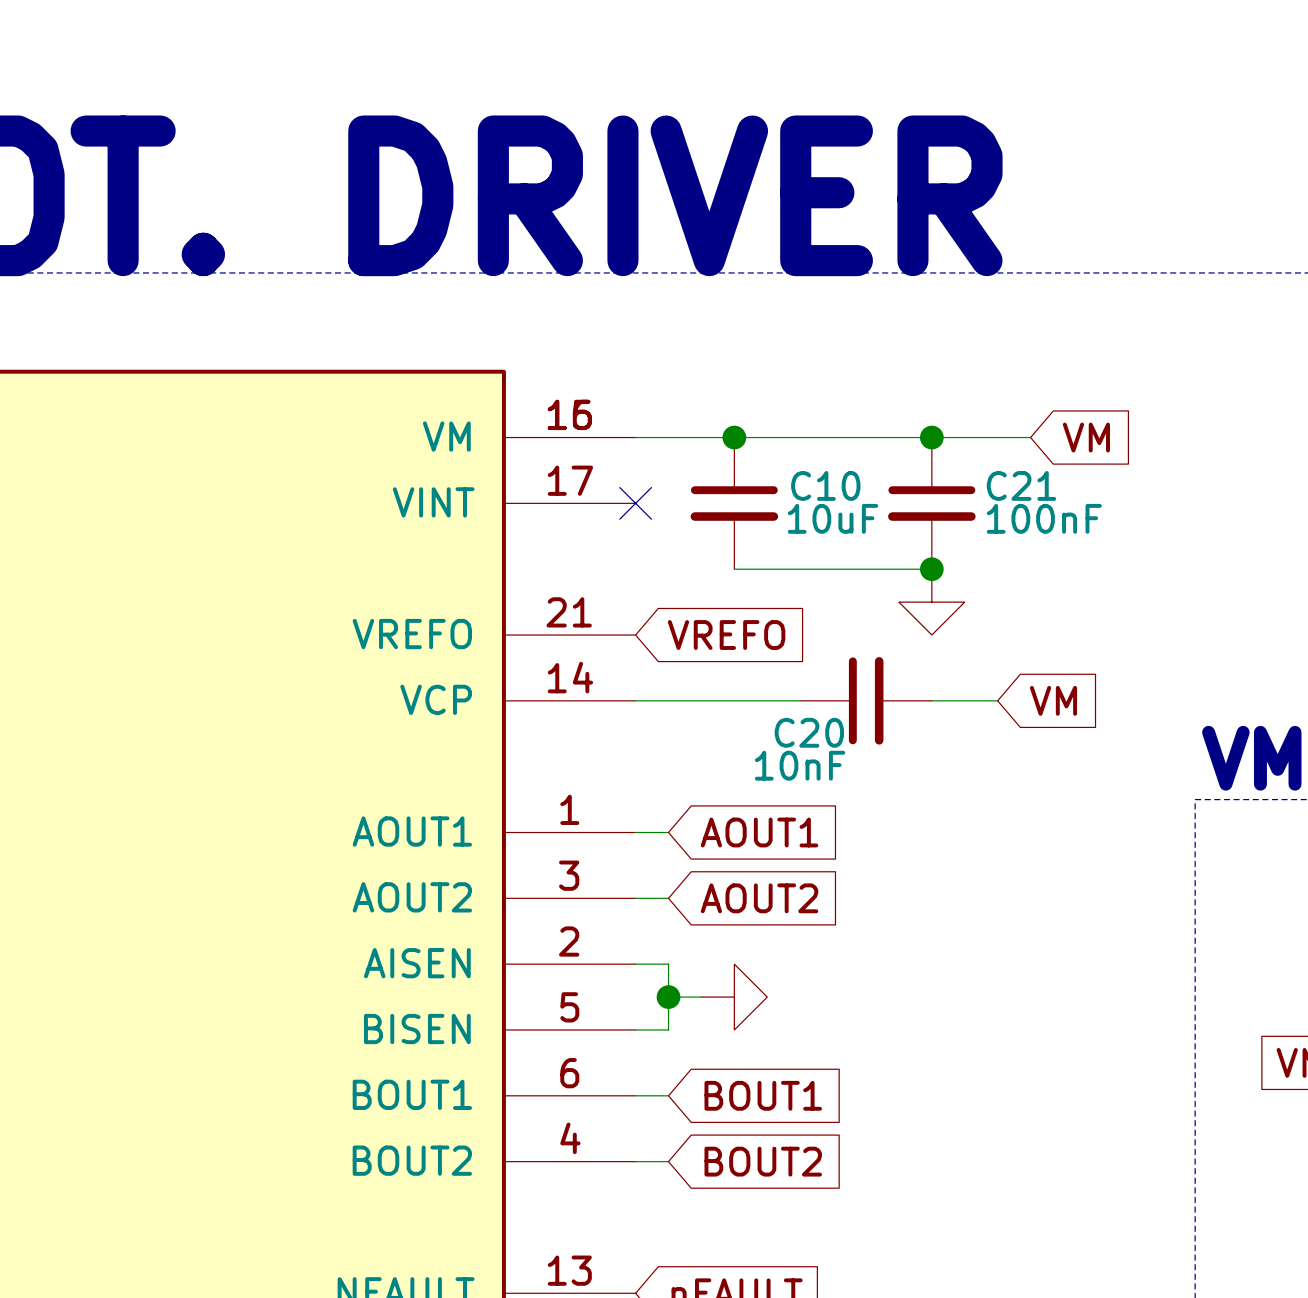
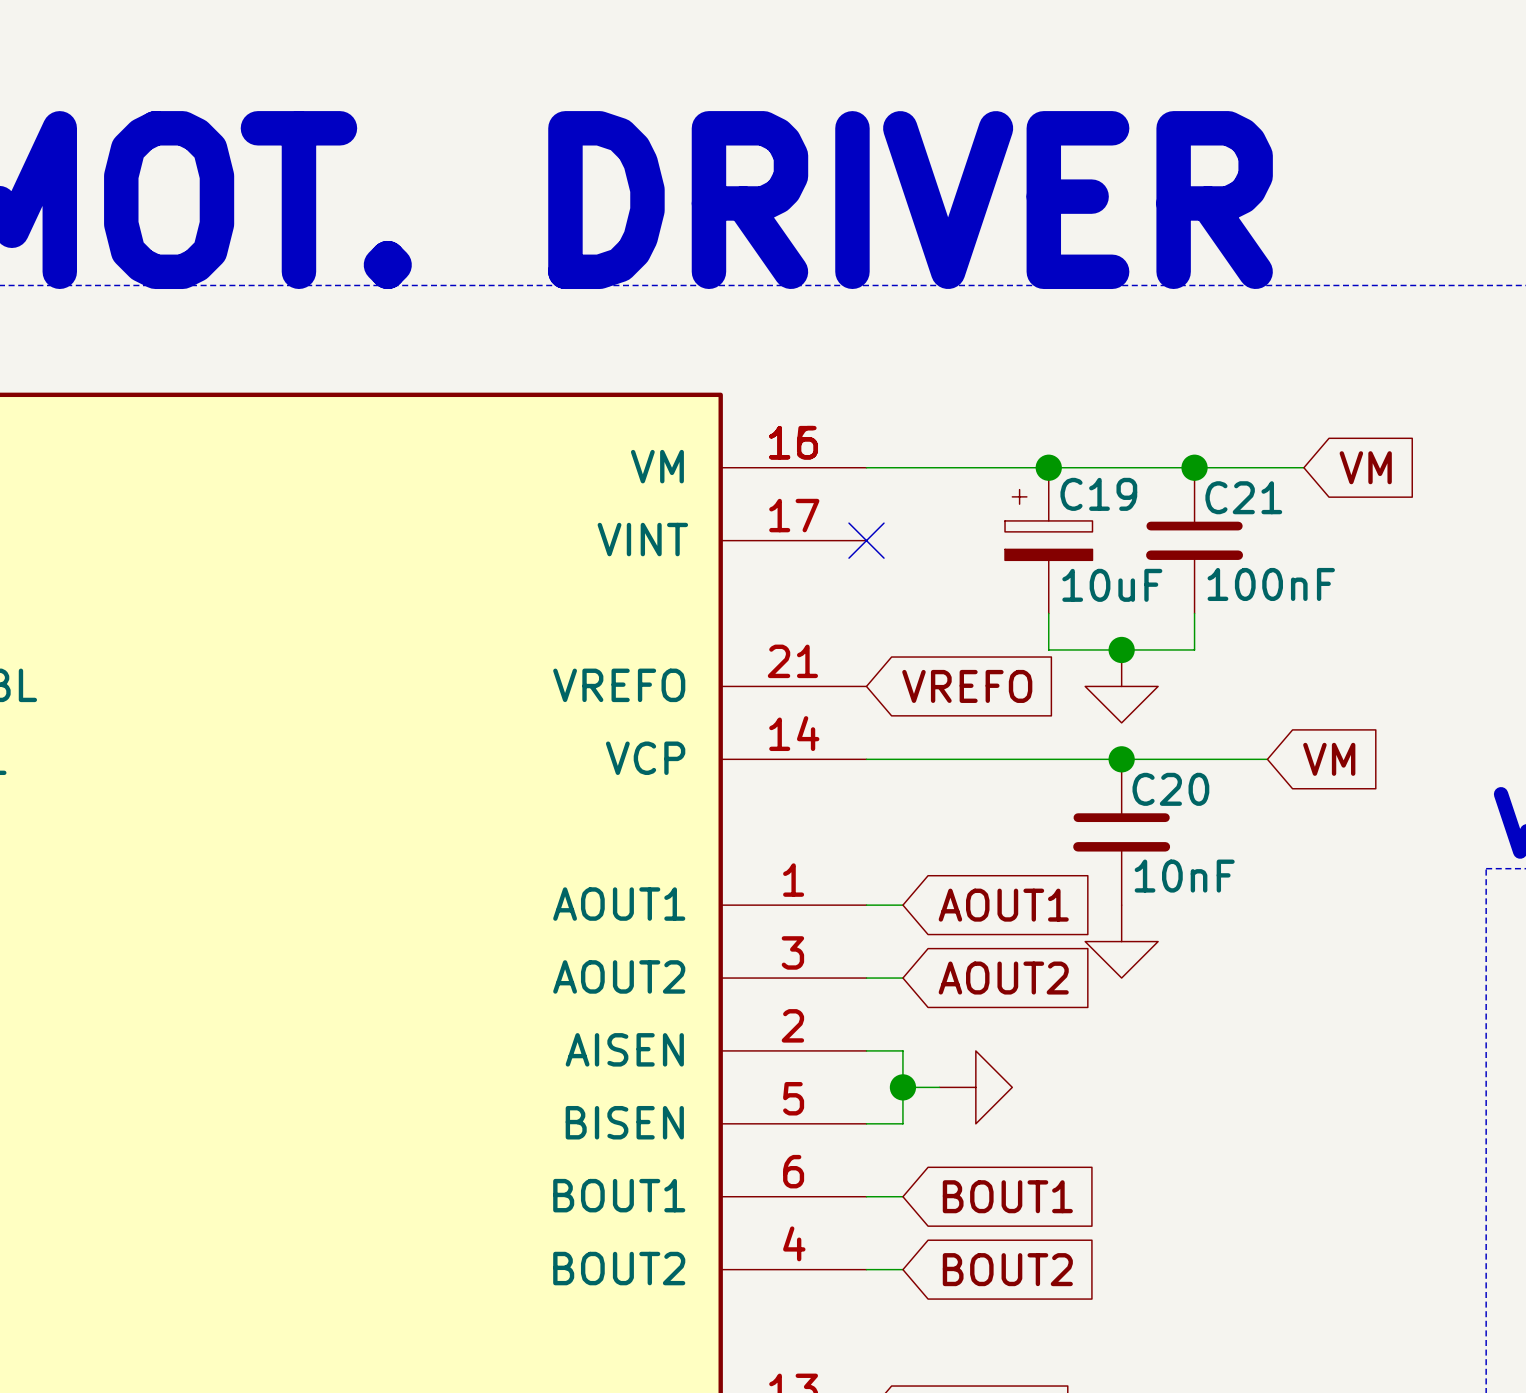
junction position: (734, 437) -> (1048, 467)
C21 name position: C21 (1021, 485) -> C21 (1243, 497)
C10: 10uF (734, 503) -> none
C19: none -> 10uF (1048, 540)
C21 value position: 100nF (1044, 518) -> 100nF (1271, 584)
wire: (734, 569) (931, 569) -> (1048, 613) (1048, 649) (1194, 649) (1194, 613)
junction: (931, 569) -> none
junction: none -> (1121, 649)
power symbol position: (931, 602) -> (1121, 686)
junction: none -> (1121, 759)
C20 rotation: 0° (866, 700) -> 90° clockwise (1121, 832)
C20 name position: C20 (809, 732) -> C20 (1170, 789)
C20 value position: 10nF (800, 765) -> 10nF (1184, 876)
power symbol: none -> (1121, 941)

